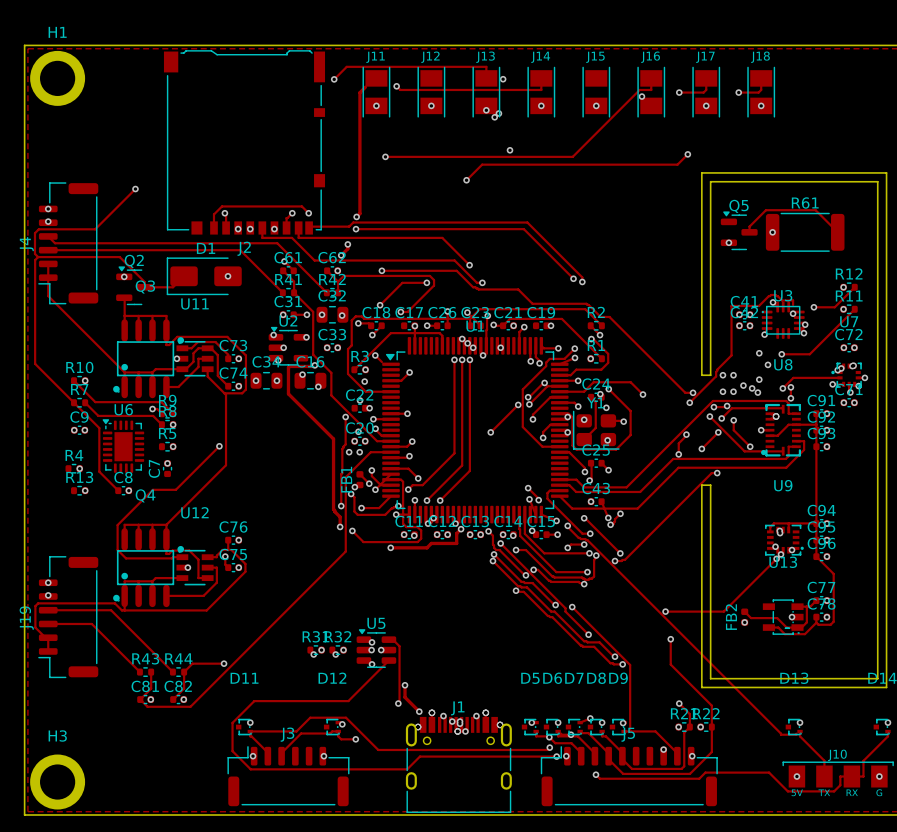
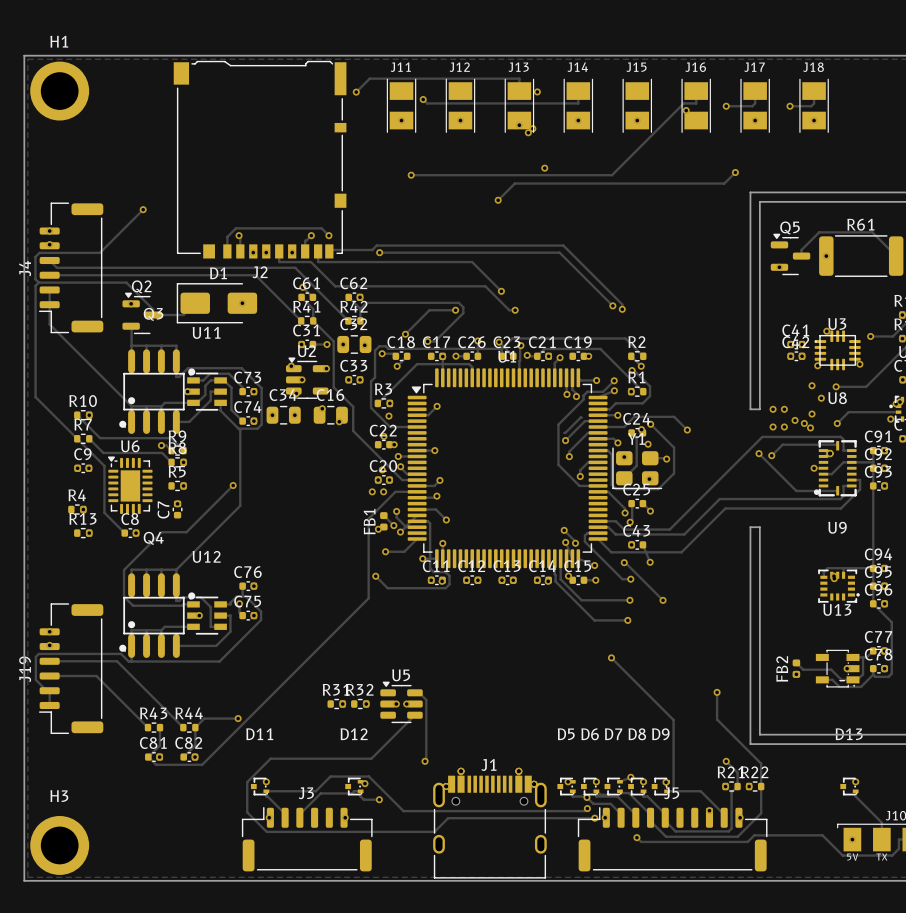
track: (365, 87) (359, 92) (359, 213) (356, 216) -> none
via: (356, 216) -> none
track: (347, 244) (347, 248) (341, 255) -> none
via: (347, 244) -> none
via: (341, 255) -> none
track: (381, 270) (456, 270) (473, 287) (478, 289) (518, 289) (532, 303) (586, 303) (600, 316) (609, 316) (685, 392) (693, 392) -> none
via: (381, 270) -> none
track: (793, 304) (793, 300) (782, 300) (777, 296) (771, 294) (759, 305) (731, 305) (731, 355) (717, 369) (716, 376) (689, 402) -> none
via: (793, 313) -> none
via: (805, 324) -> none
via: (462, 338) -> none
via: (467, 343) -> none
via: (473, 347) -> none
via: (500, 347) -> none
track: (375, 355) (381, 362) -> none
via: (375, 355) -> none
via: (483, 355) -> none
track: (454, 359) (454, 453) (422, 485) (412, 485) (408, 489) -> none
via: (454, 359) -> none
track: (462, 359) (462, 465) (426, 500) -> none
via: (462, 359) -> none
track: (469, 359) (469, 470) (440, 500) -> none
via: (469, 359) -> none
track: (314, 365) (288, 367) (288, 393) (333, 439) (333, 509) (340, 517) (340, 526) -> none
via: (314, 365) -> none
via: (544, 382) -> none
track: (790, 387) (790, 398) -> none
via: (790, 387) -> none
via: (693, 392) -> none
via: (528, 397) -> none
via: (790, 398) -> none
via: (689, 402) -> none
track: (518, 404) (490, 432) -> none
via: (518, 404) -> none
track: (727, 406) (713, 407) -> none
via: (727, 406) -> none
via: (713, 407) -> none
track: (345, 417) (345, 444) (342, 448) (341, 506) -> none
via: (345, 417) -> none
via: (567, 417) -> none
track: (733, 420) (733, 430) (750, 446) -> none
via: (733, 420) -> none
via: (490, 432) -> none
via: (567, 432) -> none
track: (718, 432) (701, 448) -> none
via: (718, 432) -> none
track: (686, 434) (678, 443) (678, 454) -> none
via: (686, 434) -> none
via: (750, 446) -> none
via: (701, 448) -> none
via: (678, 454) -> none
track: (717, 473) (711, 473) (624, 559) (614, 561) -> none
via: (717, 473) -> none
via: (408, 489) -> none
track: (351, 493) (354, 497) (354, 511) (357, 514) (385, 514) (391, 508) (398, 506) -> none
via: (351, 493) -> none
via: (426, 500) -> none
via: (440, 500) -> none
via: (341, 506) -> none
via: (398, 506) -> none
track: (620, 513) (614, 519) (613, 523) (610, 524) -> none
via: (620, 513) -> none
via: (433, 518) -> none
via: (428, 523) -> none
via: (455, 523) -> none
via: (610, 524) -> none
track: (567, 525) (578, 537) (587, 540) (781, 734) (796, 733) -> none
via: (567, 525) -> none
via: (340, 526) -> none
track: (461, 529) (456, 533) (456, 543) (431, 543) (426, 547) (390, 547) -> none
via: (461, 529) -> none
track: (488, 531) (492, 535) (494, 547) (499, 550) (525, 575) -> none
via: (488, 531) -> none
track: (500, 543) (565, 608) (565, 611) (588, 634) -> none
via: (500, 543) -> none
track: (584, 544) (571, 544) (567, 547) -> none
via: (584, 544) -> none
via: (775, 546) -> none
via: (390, 547) -> none
via: (567, 547) -> none
track: (516, 550) (525, 550) (554, 577) (582, 577) (585, 579) (594, 576) (594, 559) (596, 555) -> none
via: (516, 550) -> none
via: (791, 550) -> none
track: (494, 554) (521, 581) (532, 583) (555, 605) -> none
via: (494, 554) -> none
via: (781, 554) -> none
via: (596, 555) -> none
track: (776, 558) (723, 611) (665, 611) -> none
via: (776, 558) -> none
track: (492, 561) (518, 586) (527, 587) (584, 641) (599, 642) (614, 656) -> none
via: (492, 561) -> none
via: (614, 561) -> none
track: (533, 569) (538, 569) (551, 581) (578, 581) (584, 584) -> none
via: (533, 569) -> none
via: (525, 575) -> none
via: (584, 584) -> none
track: (516, 590) (523, 591) (580, 645) (594, 646) (610, 663) (622, 664) -> none
via: (516, 590) -> none
via: (555, 605) -> none
via: (665, 611) -> none
via: (588, 634) -> none
via: (372, 642) -> none
via: (313, 654) -> none
via: (335, 654) -> none
via: (614, 656) -> none
via: (372, 664) -> none
via: (622, 664) -> none
track: (405, 685) (405, 697) (419, 711) -> none
via: (405, 685) -> none
via: (419, 711) -> none
via: (443, 716) -> none
via: (476, 716) -> none
via: (452, 721) -> none
via: (459, 721) -> none
via: (459, 723) -> none
via: (457, 731) -> none
via: (465, 731) -> none
via: (571, 734) -> none

